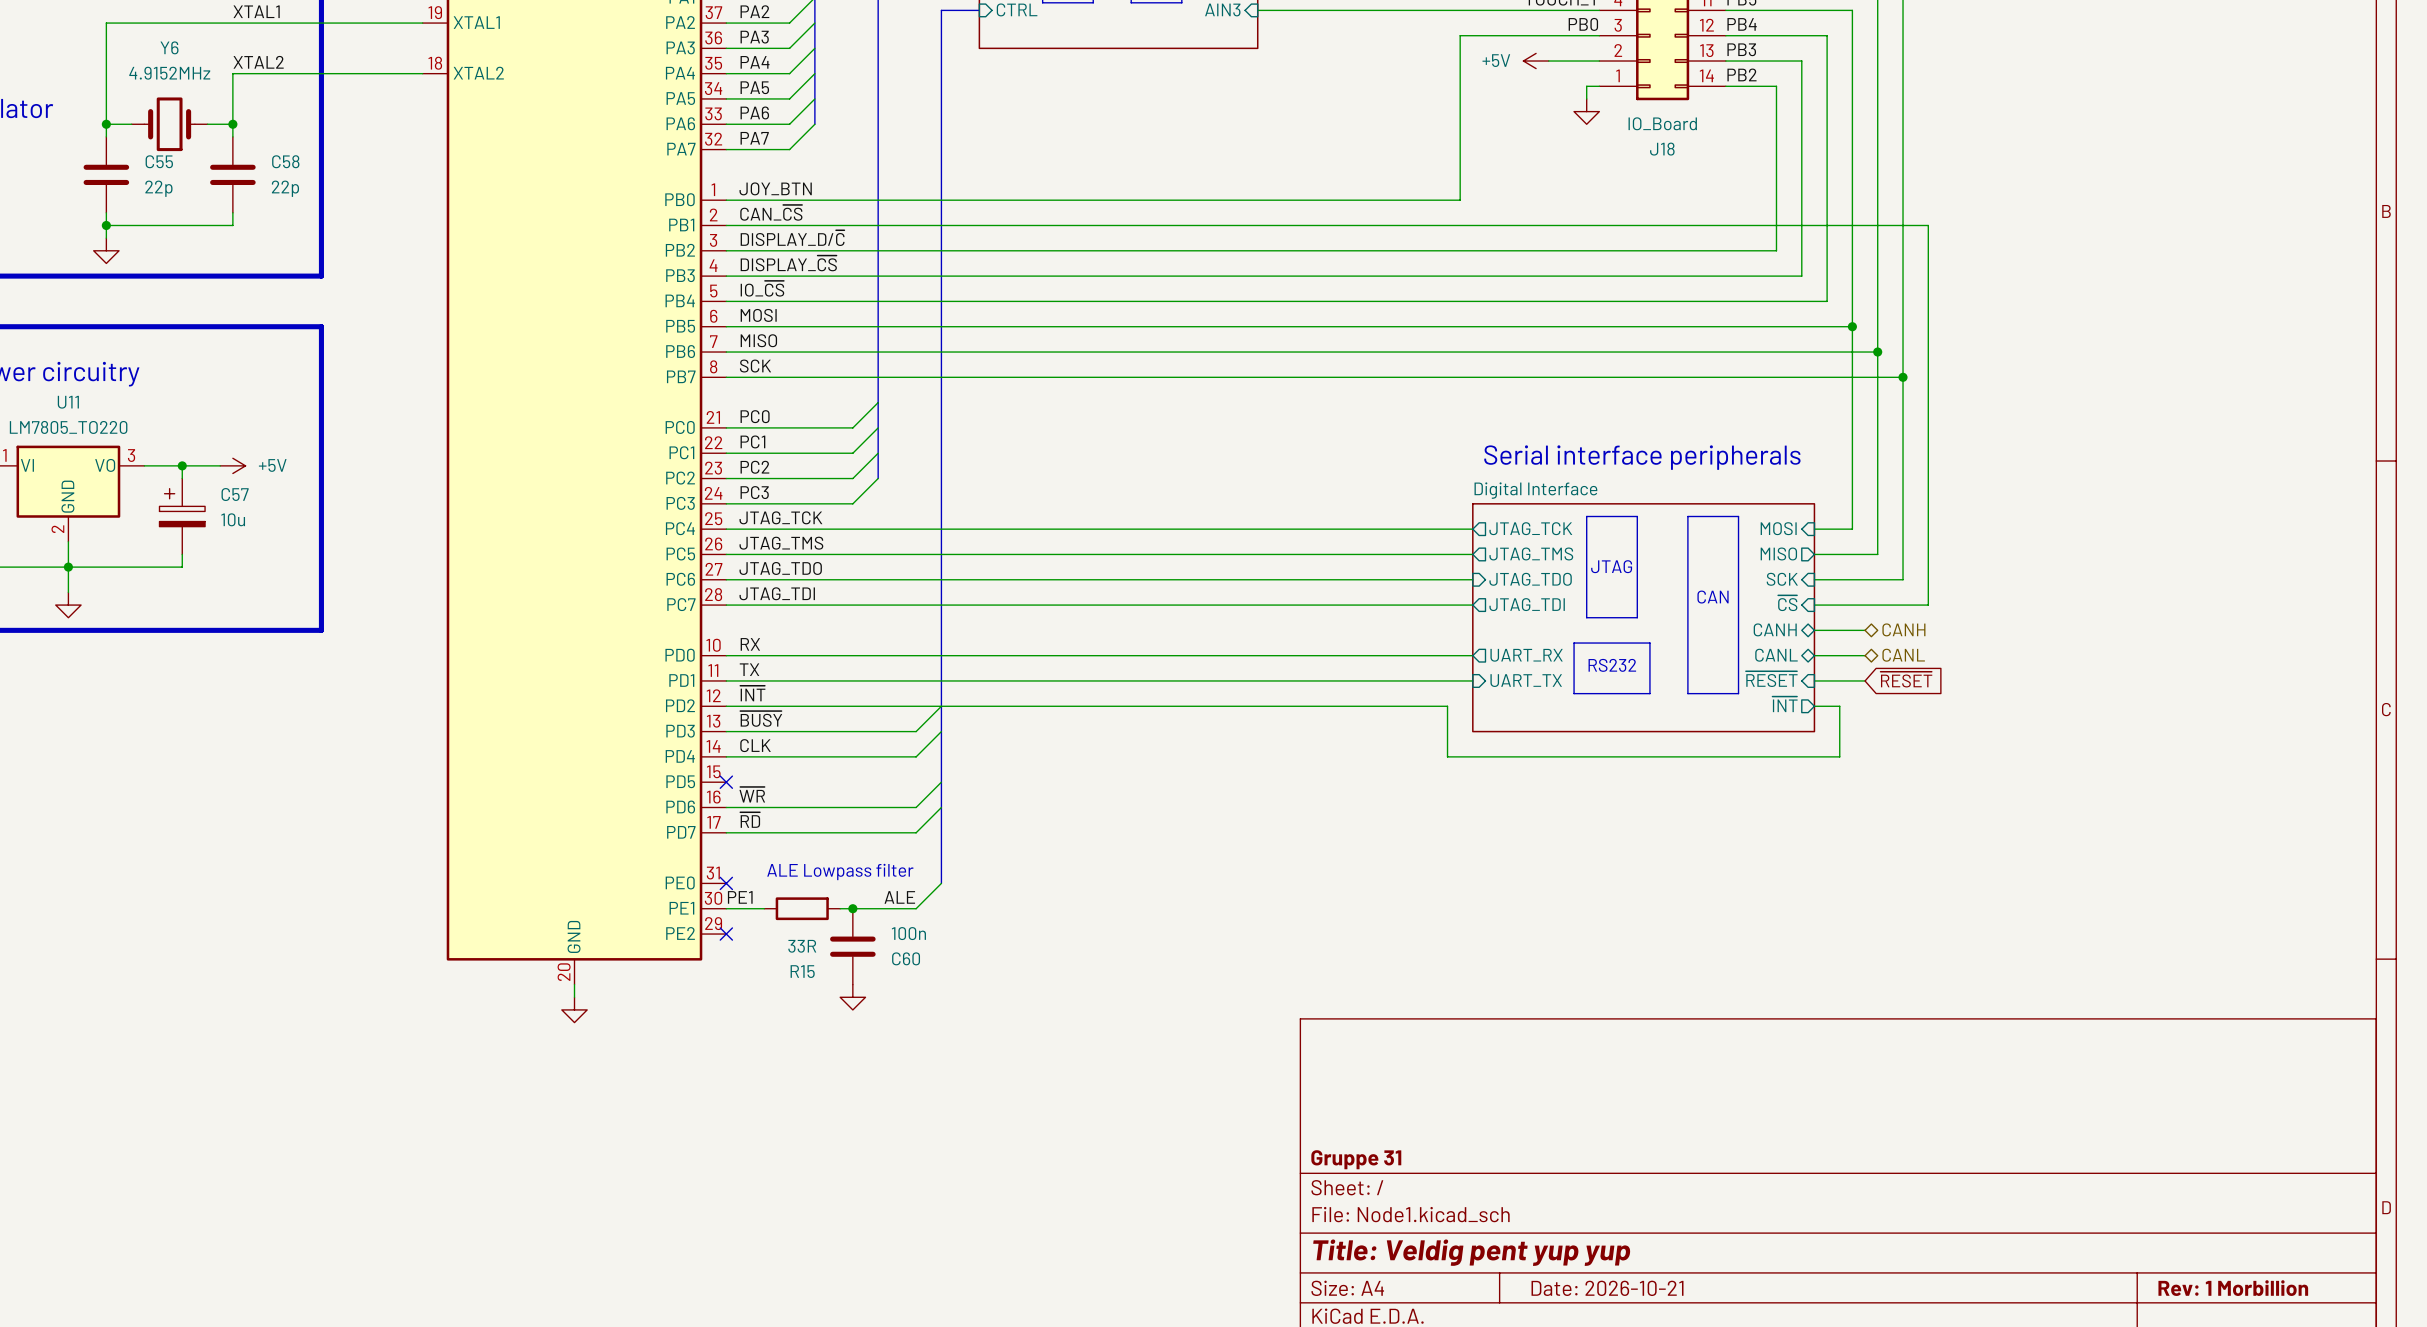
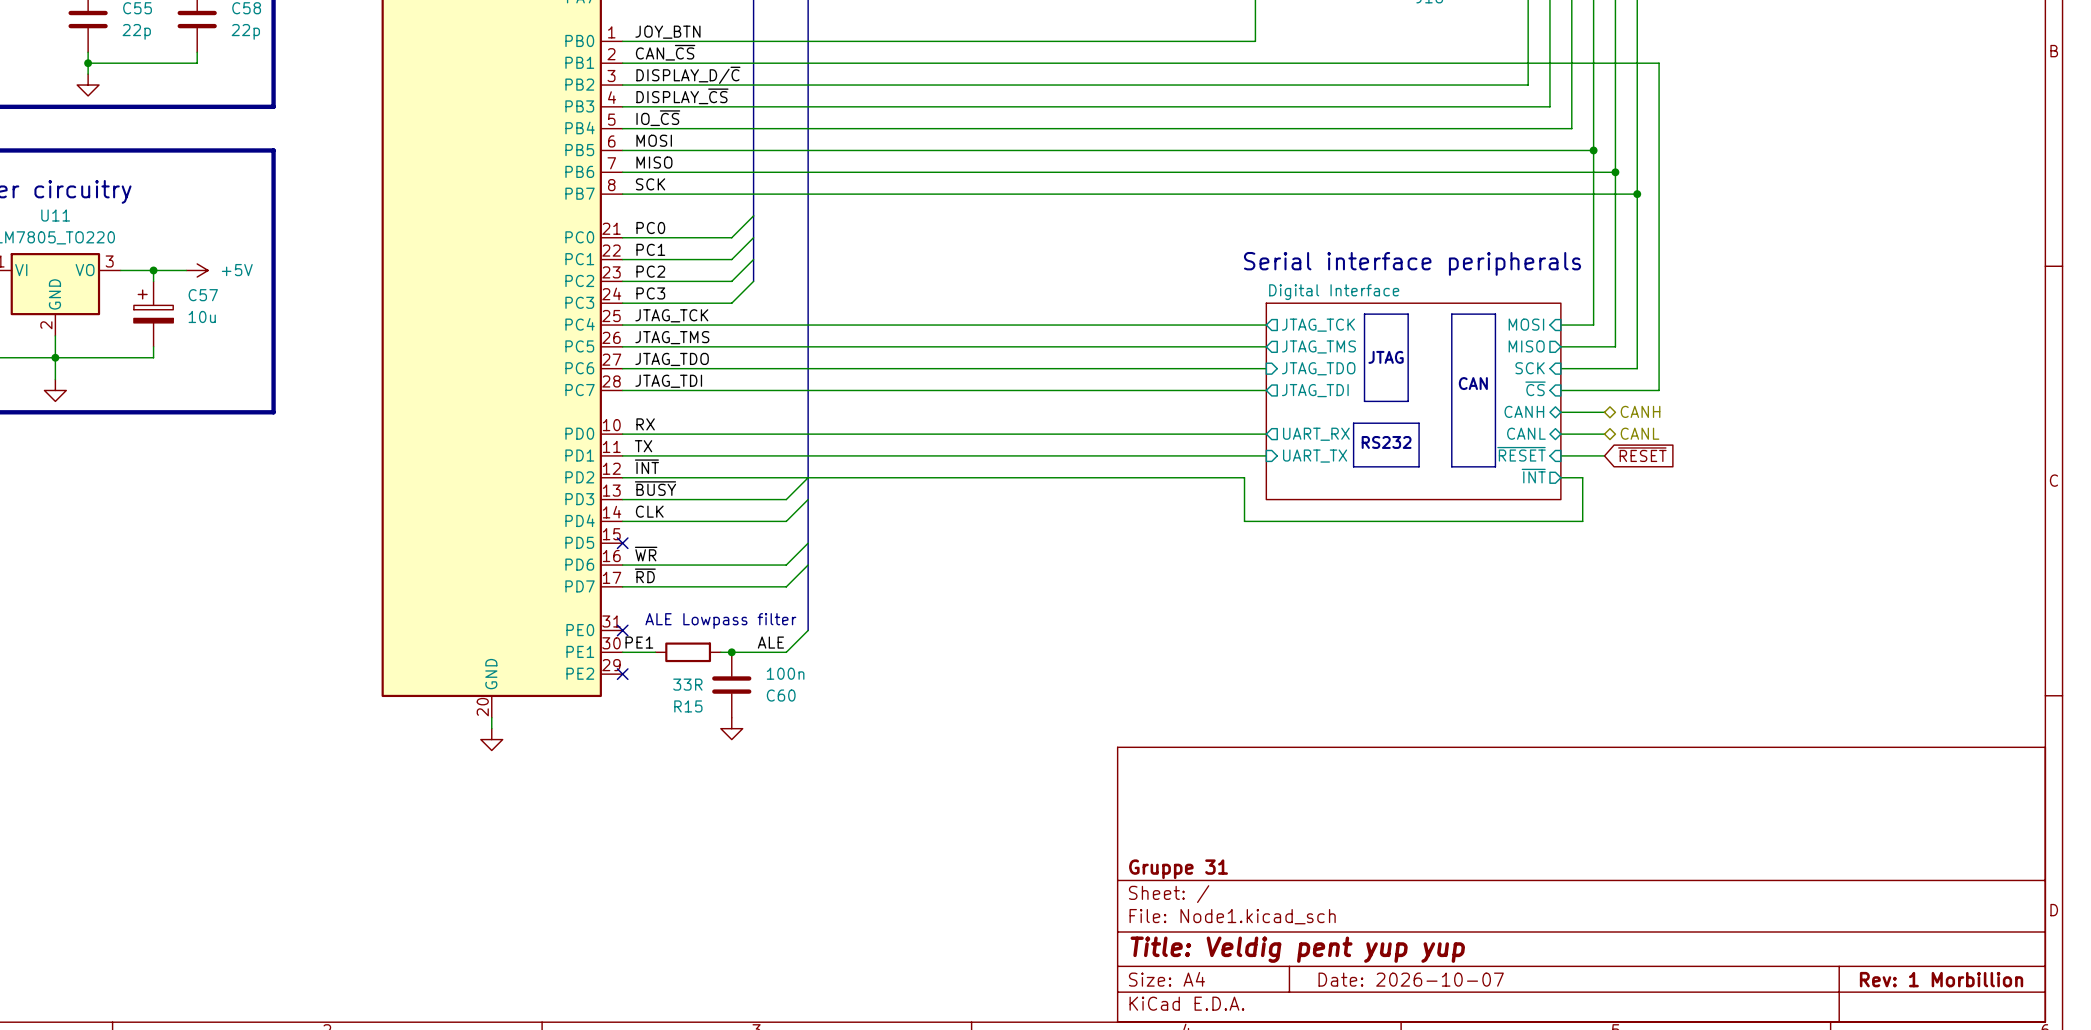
title block: Date: 2026-10-21 (1607, 1288) -> Date: 2026-10-07 (1411, 979)

